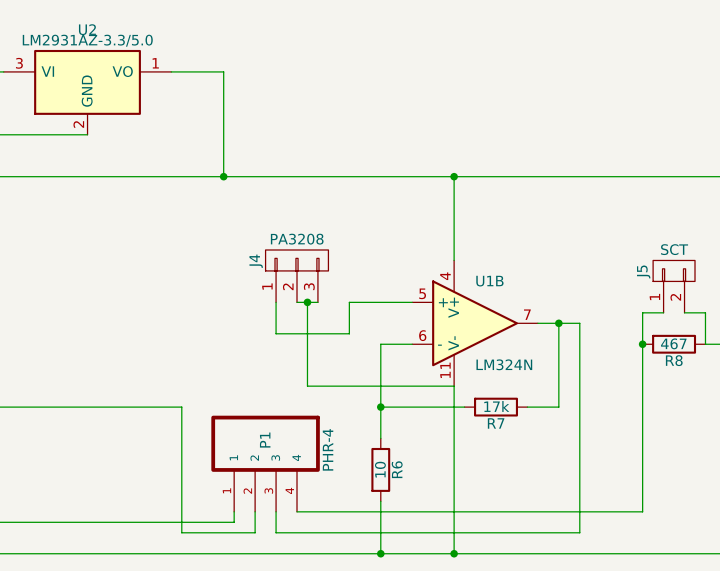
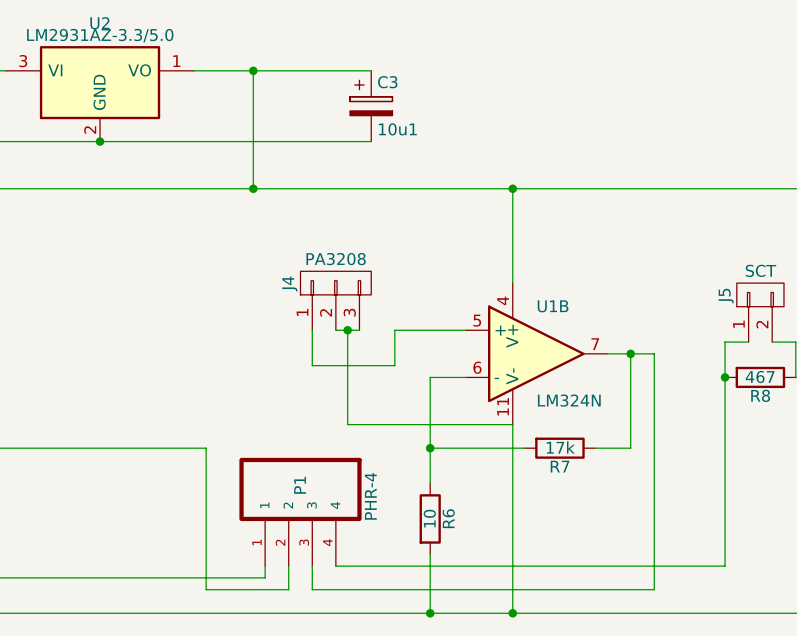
wire: none -> (253, 70) (371, 70)
junction: none -> (253, 70)
C3: none -> 10u1 (371, 106)
wire: none -> (100, 141) (371, 141)
junction: none -> (100, 141)

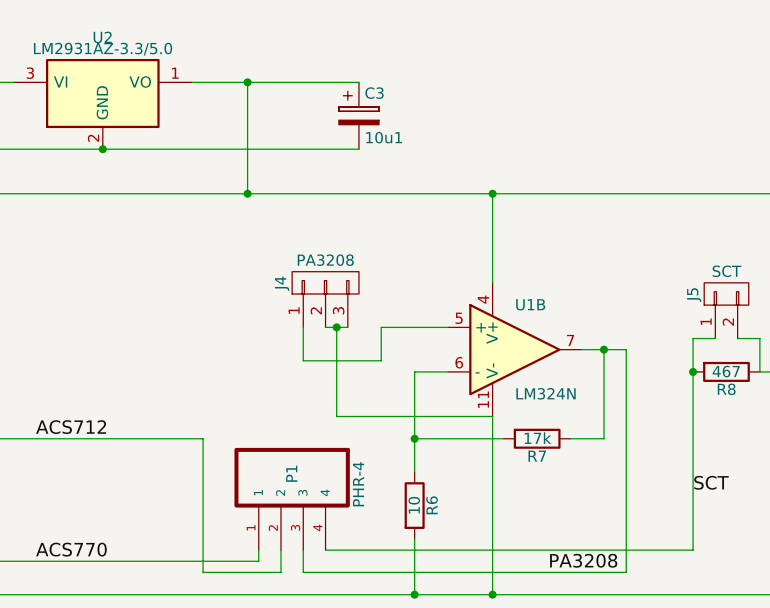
label: none -> ACS712 (71, 427)
label: none -> SCT (711, 482)
label: none -> ACS770 (71, 549)
label: none -> PA3208 (583, 560)

